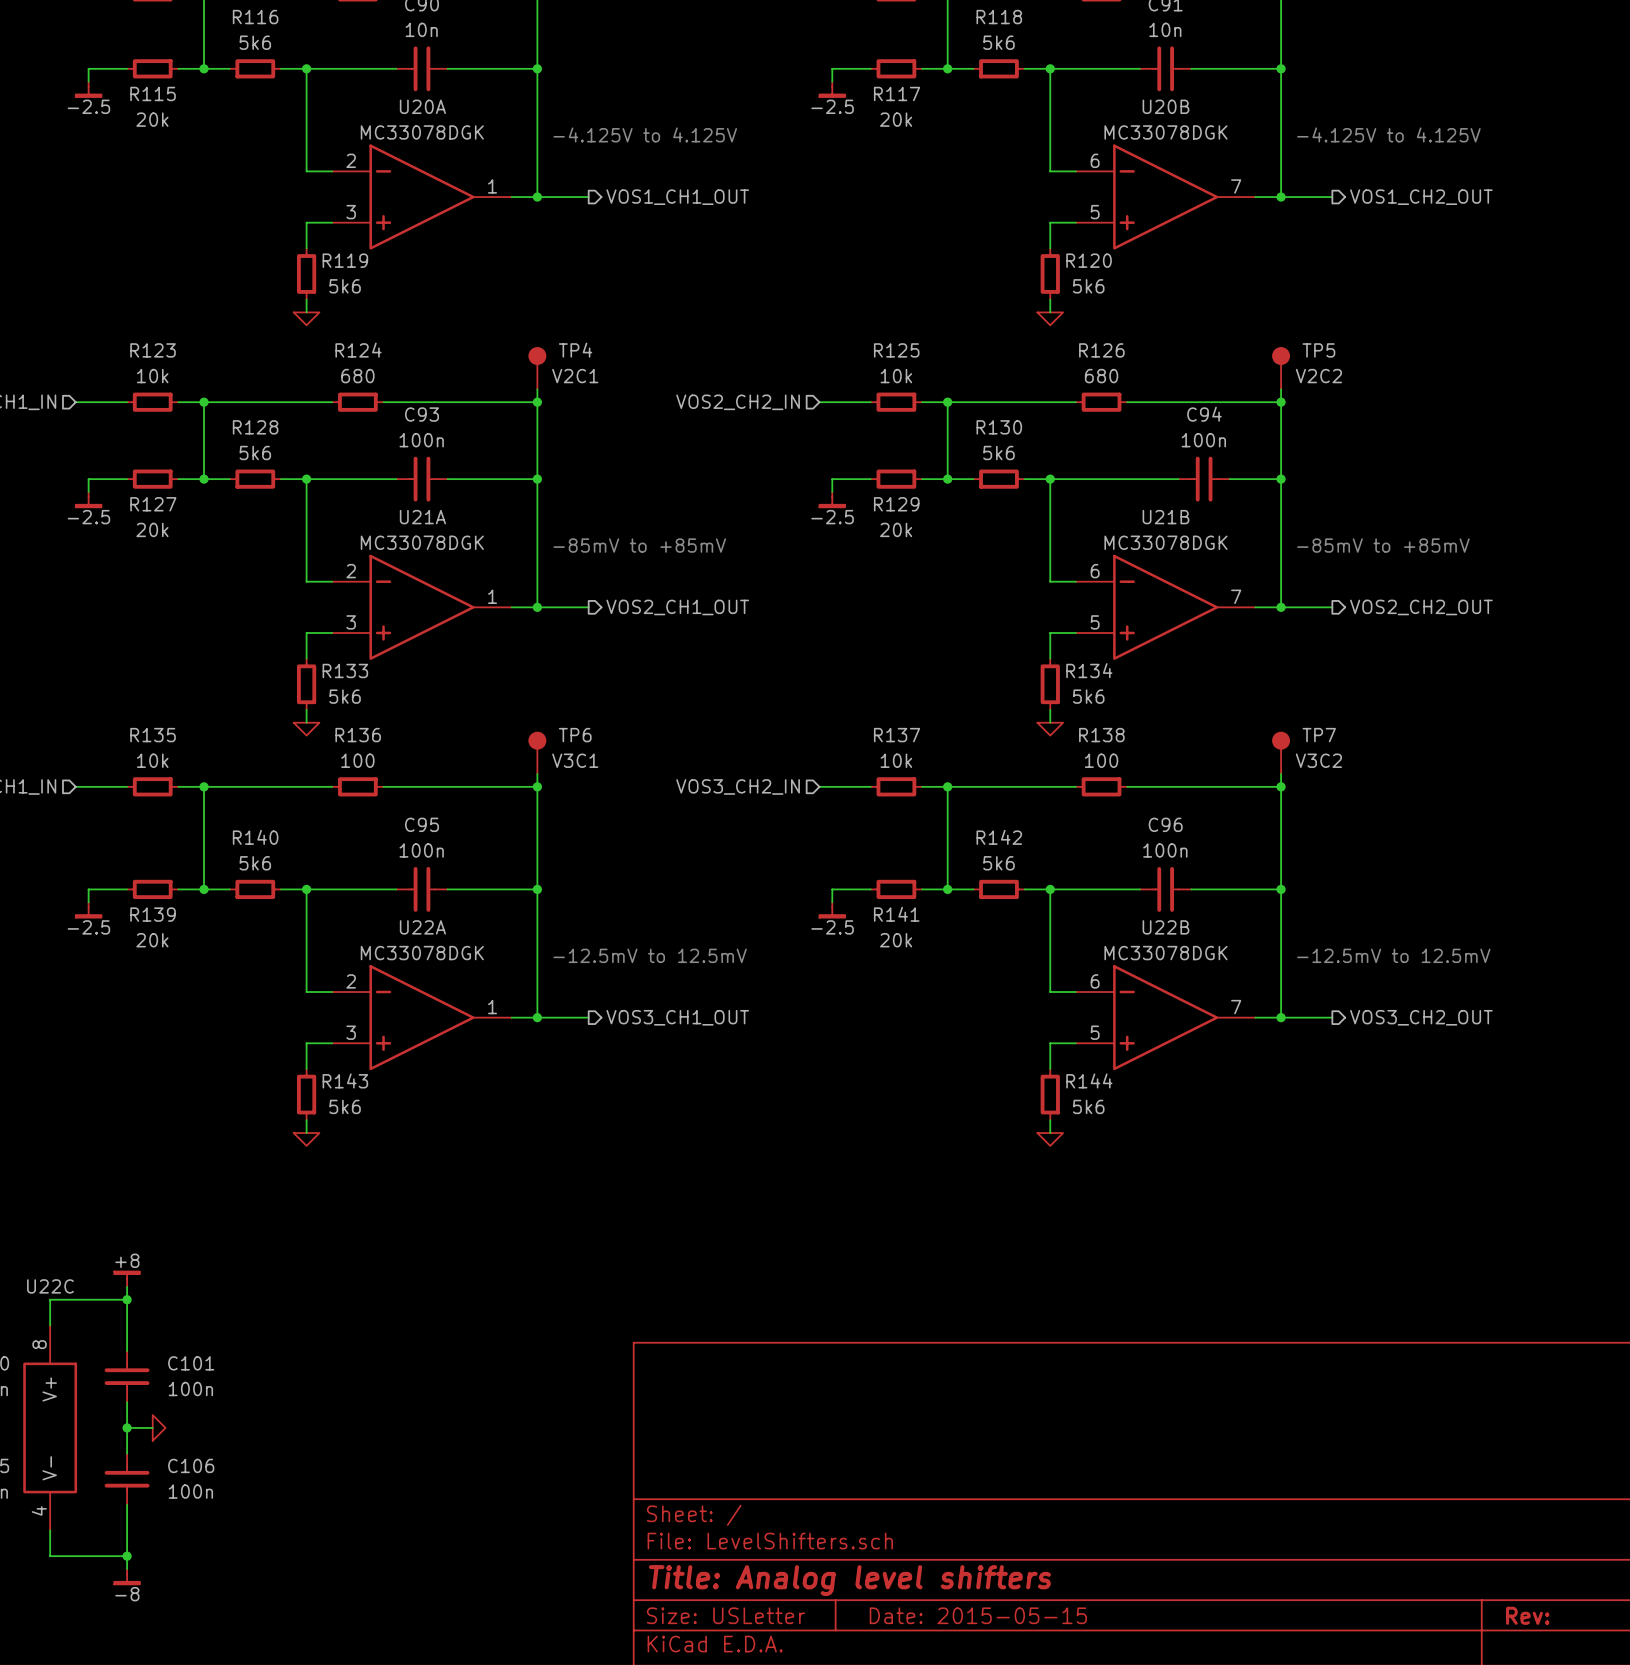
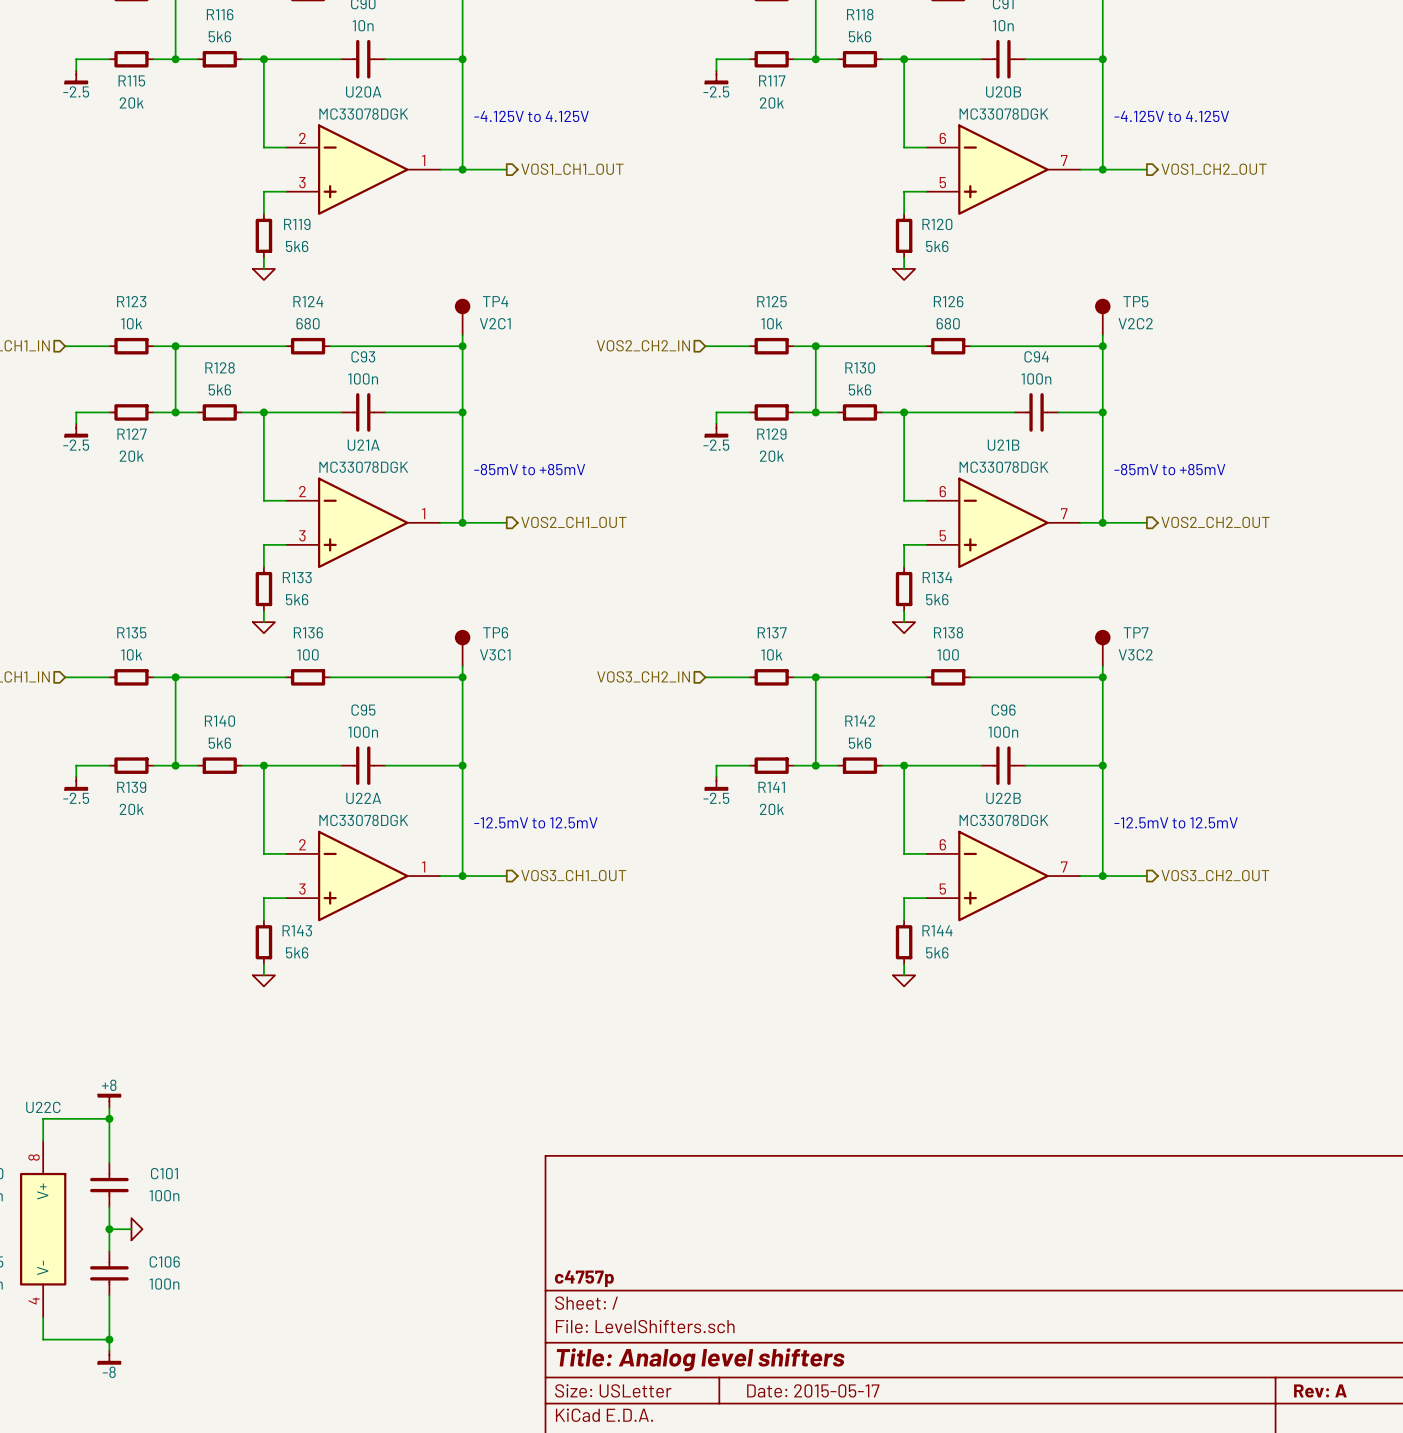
title block: none -> c4757p (584, 1278)
title block: Date: 2015-05-15 (978, 1615) -> Date: 2015-05-17 (813, 1390)
title block: Rev: (1527, 1615) -> Rev: A (1320, 1390)

